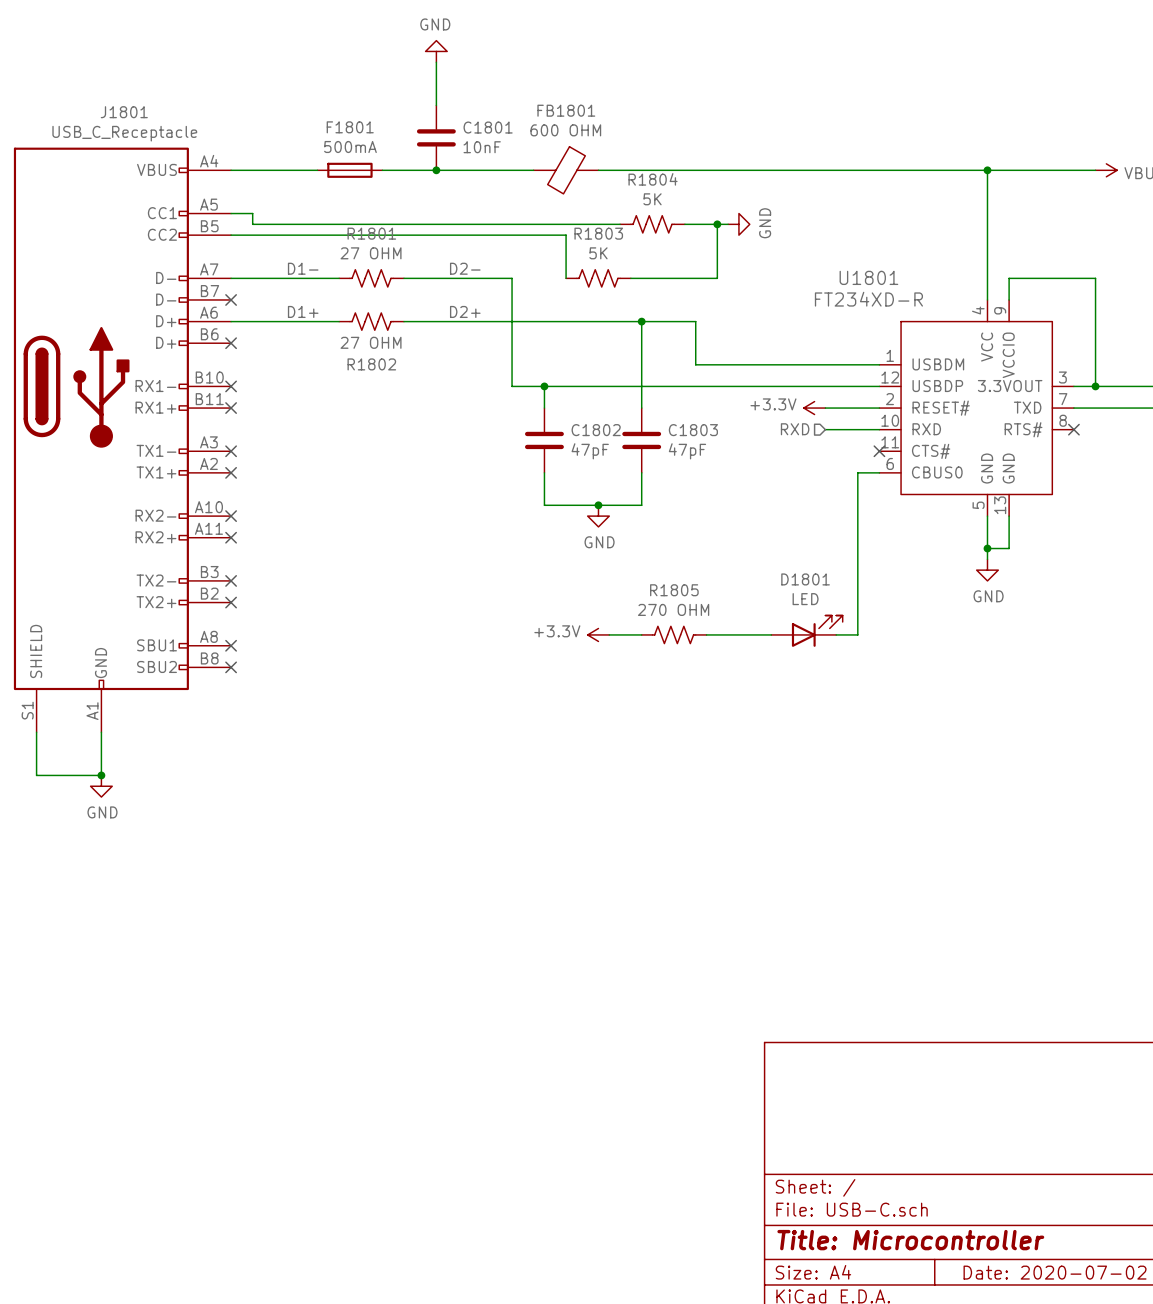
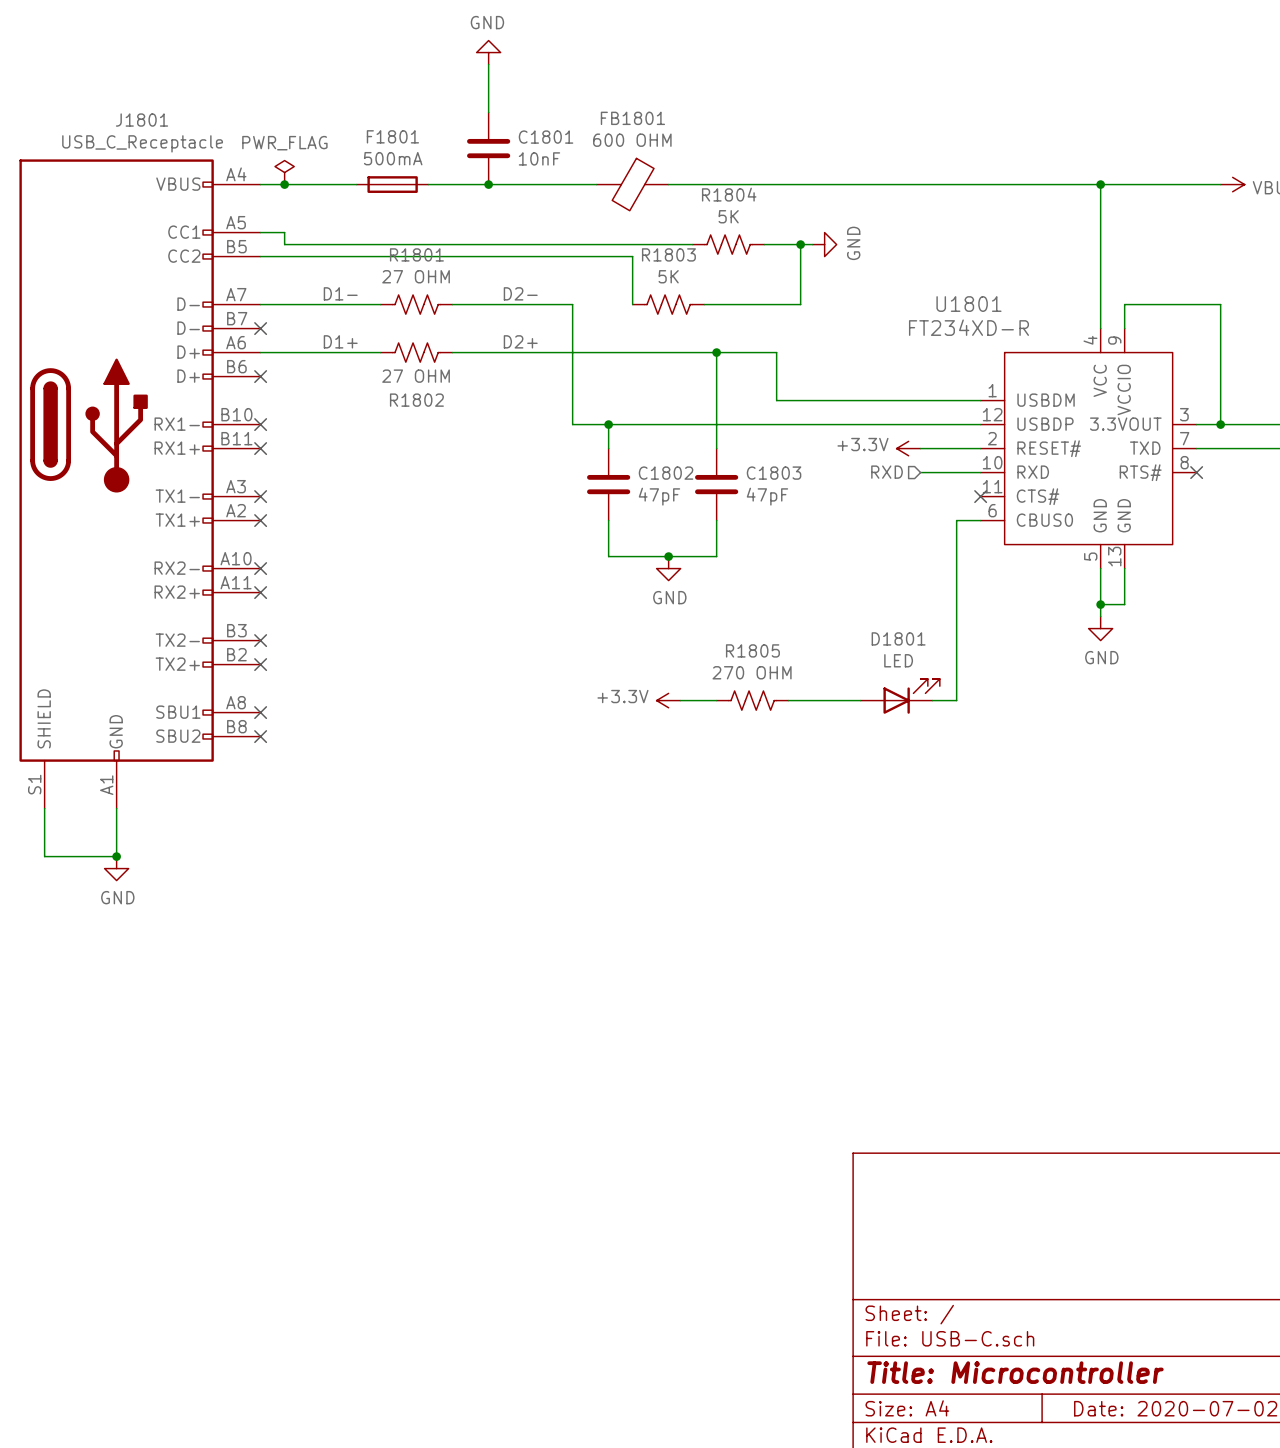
power symbol: none -> PWR_FLAG (284, 172)
junction: none -> (284, 184)

